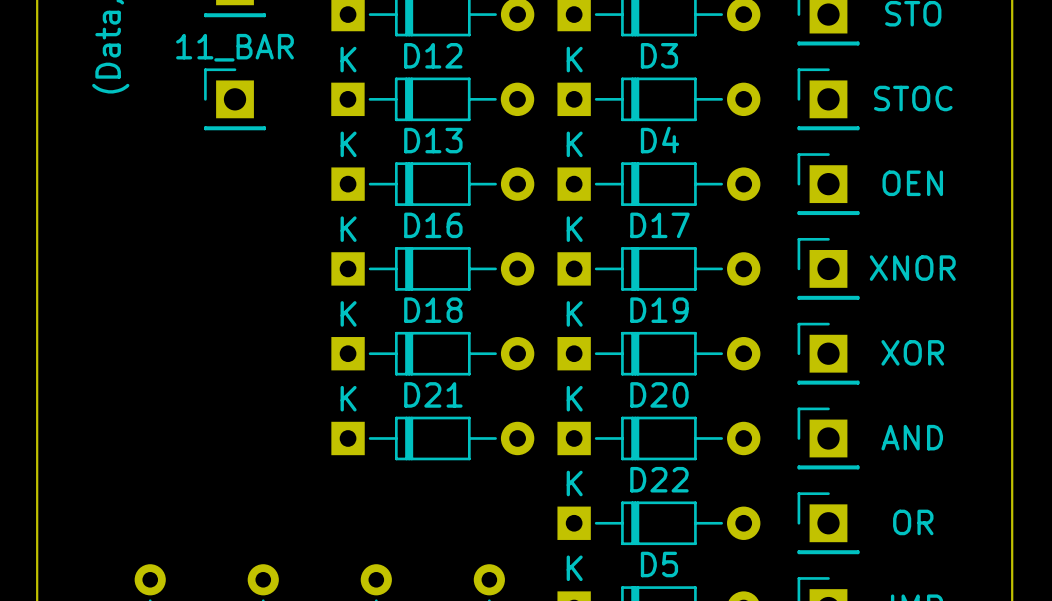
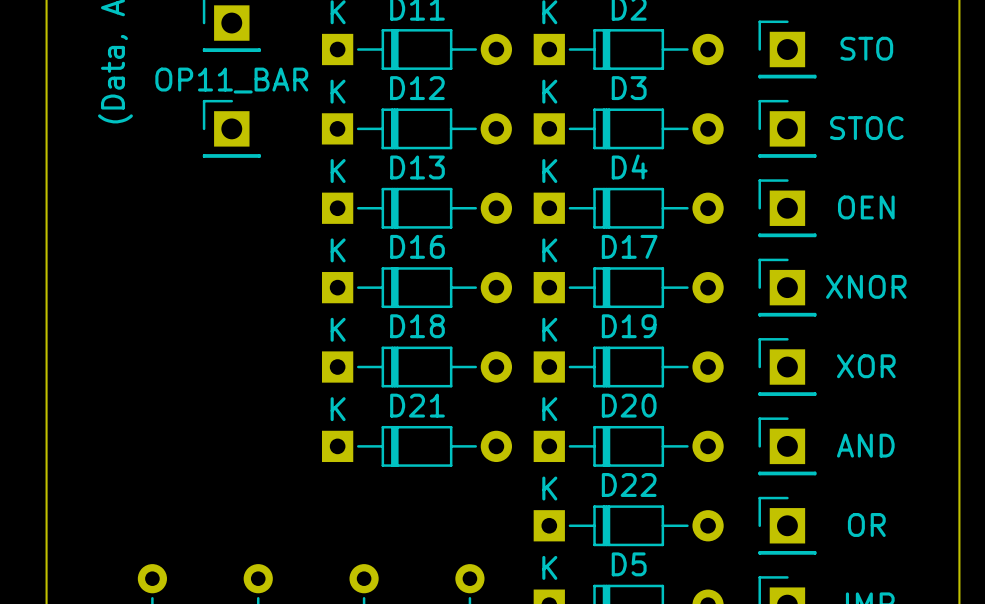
11_BAR name: 11_BAR (235, 47) -> OP11_BAR (231, 80)

